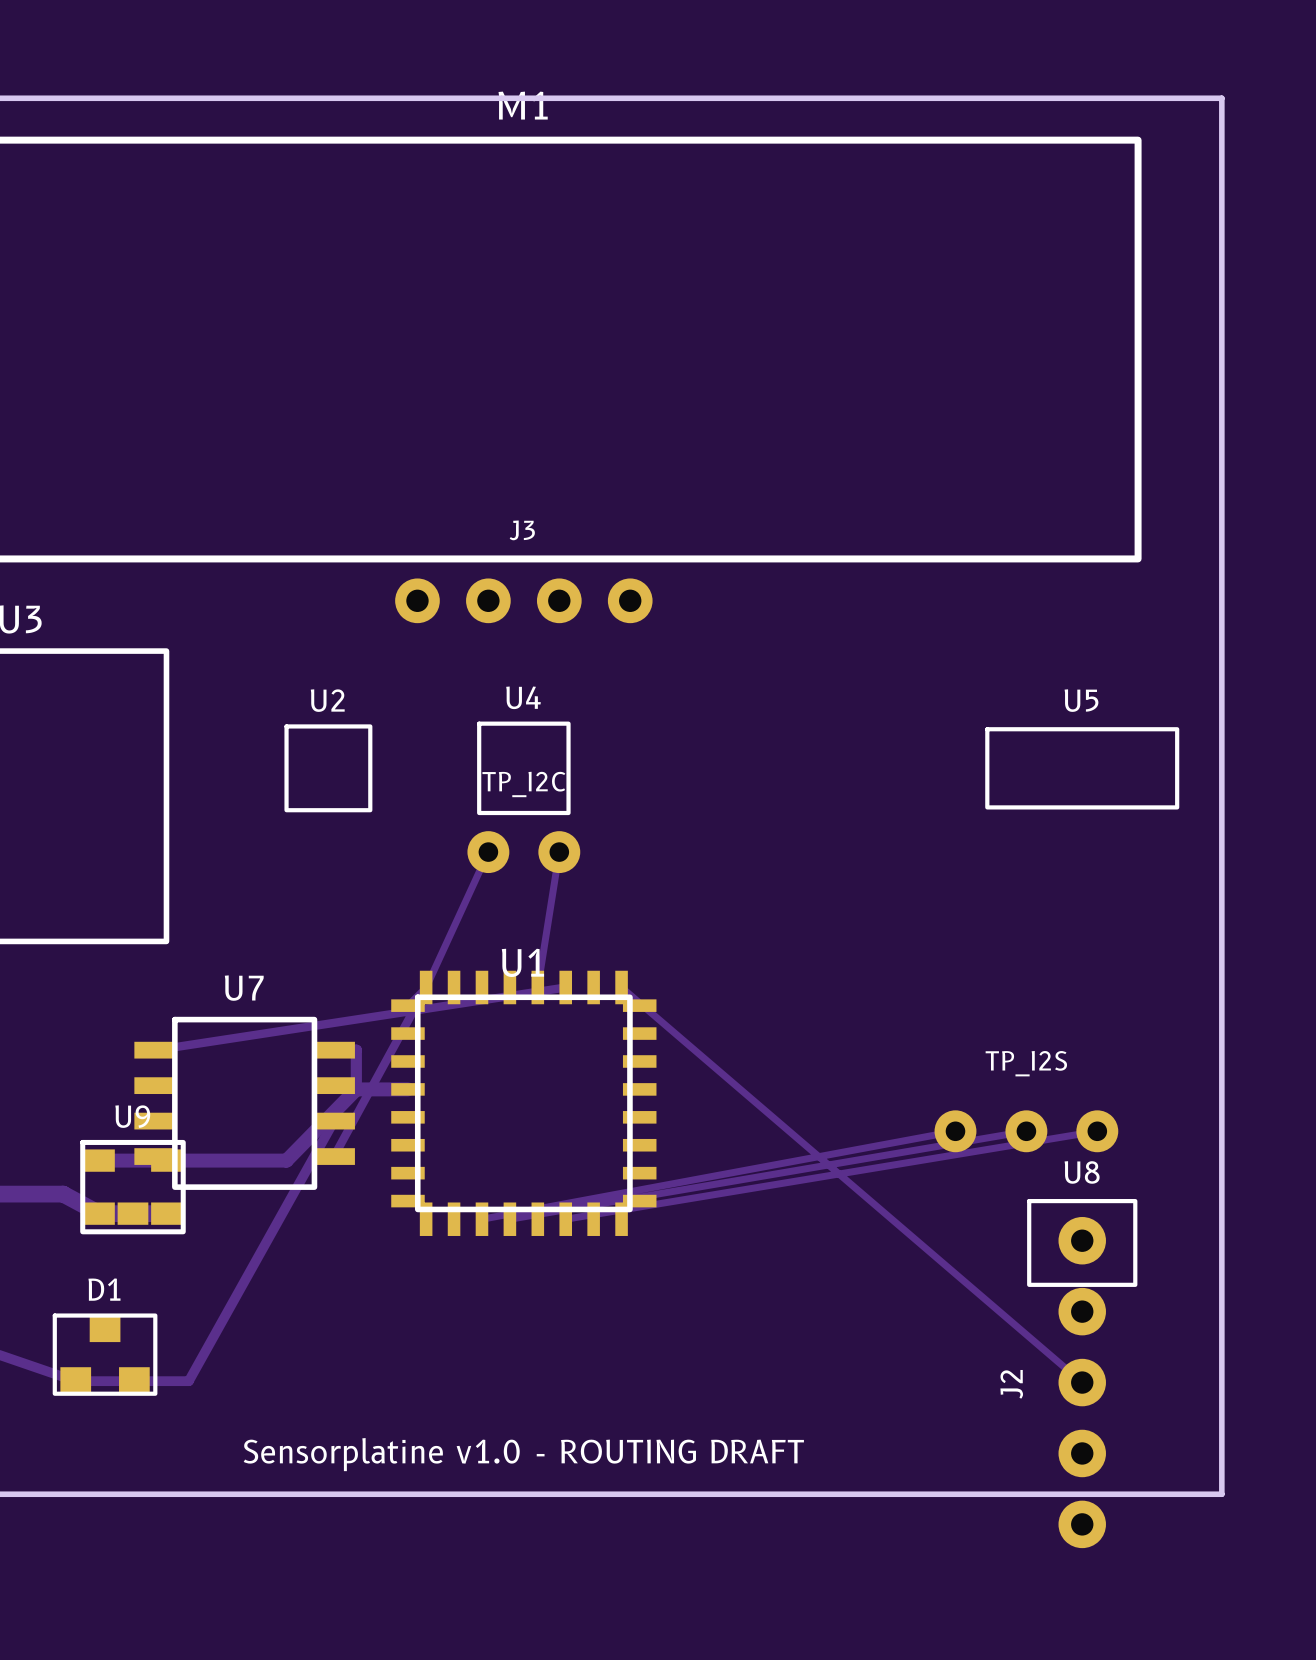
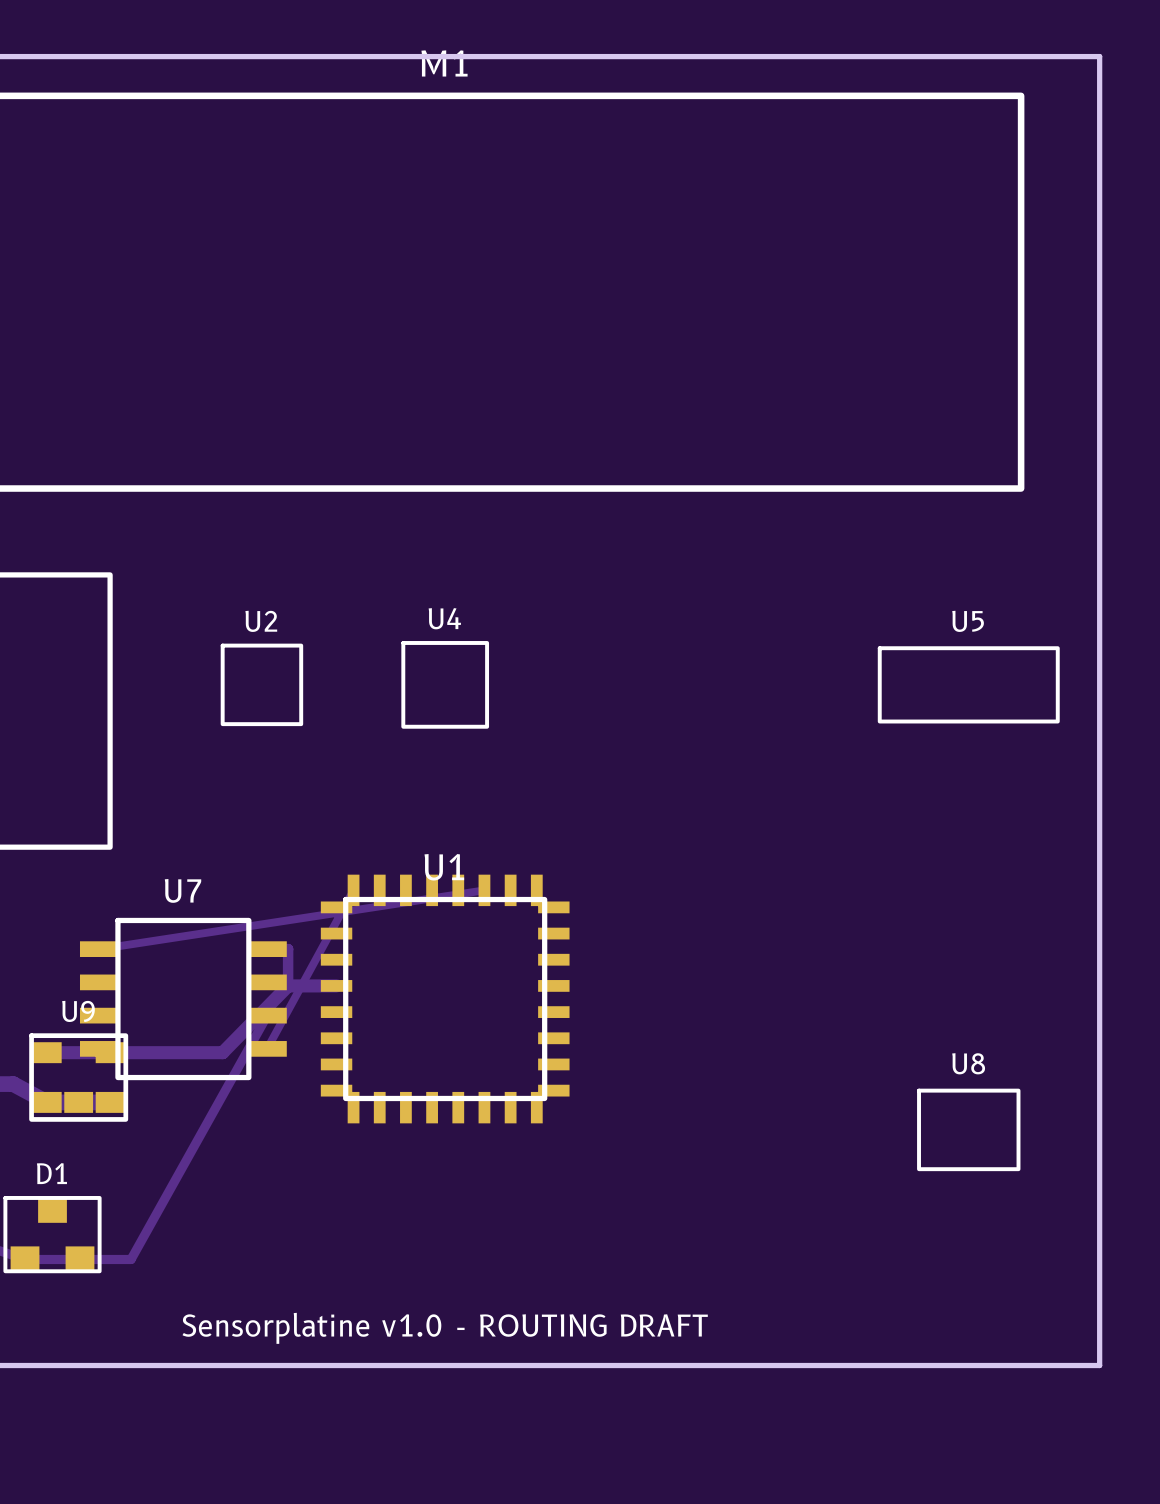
J3: (523, 600) -> none
track: (488, 852) (426, 987) (407, 1005) -> none
TP_I2C: (523, 852) -> none
track: (559, 852) (537, 987) -> none
track: (621, 987) (1082, 1382) -> none
track: (955, 1131) (481, 1219) -> none
track: (1026, 1131) (509, 1219) -> none
TP_I2S: (1026, 1131) -> none
track: (1097, 1131) (565, 1219) -> none
J2: (1082, 1382) -> none

